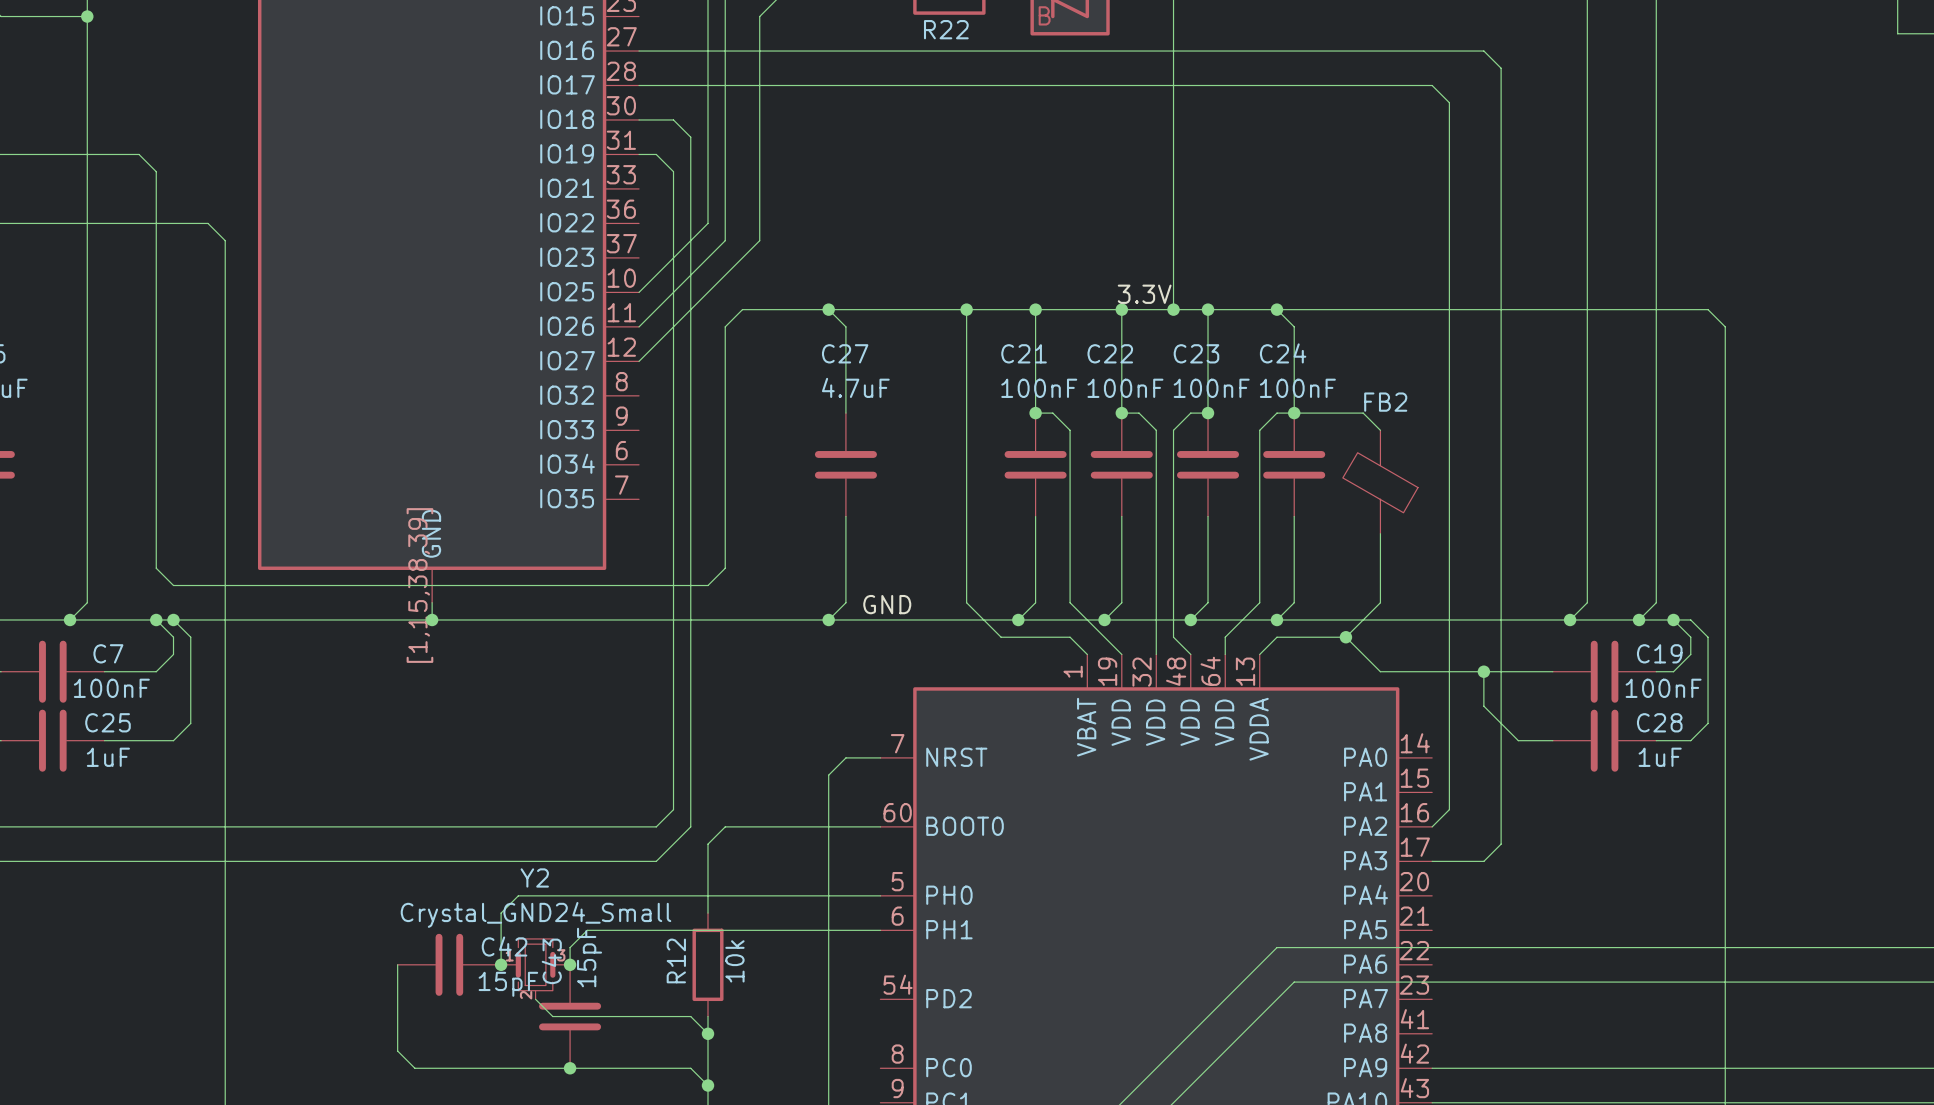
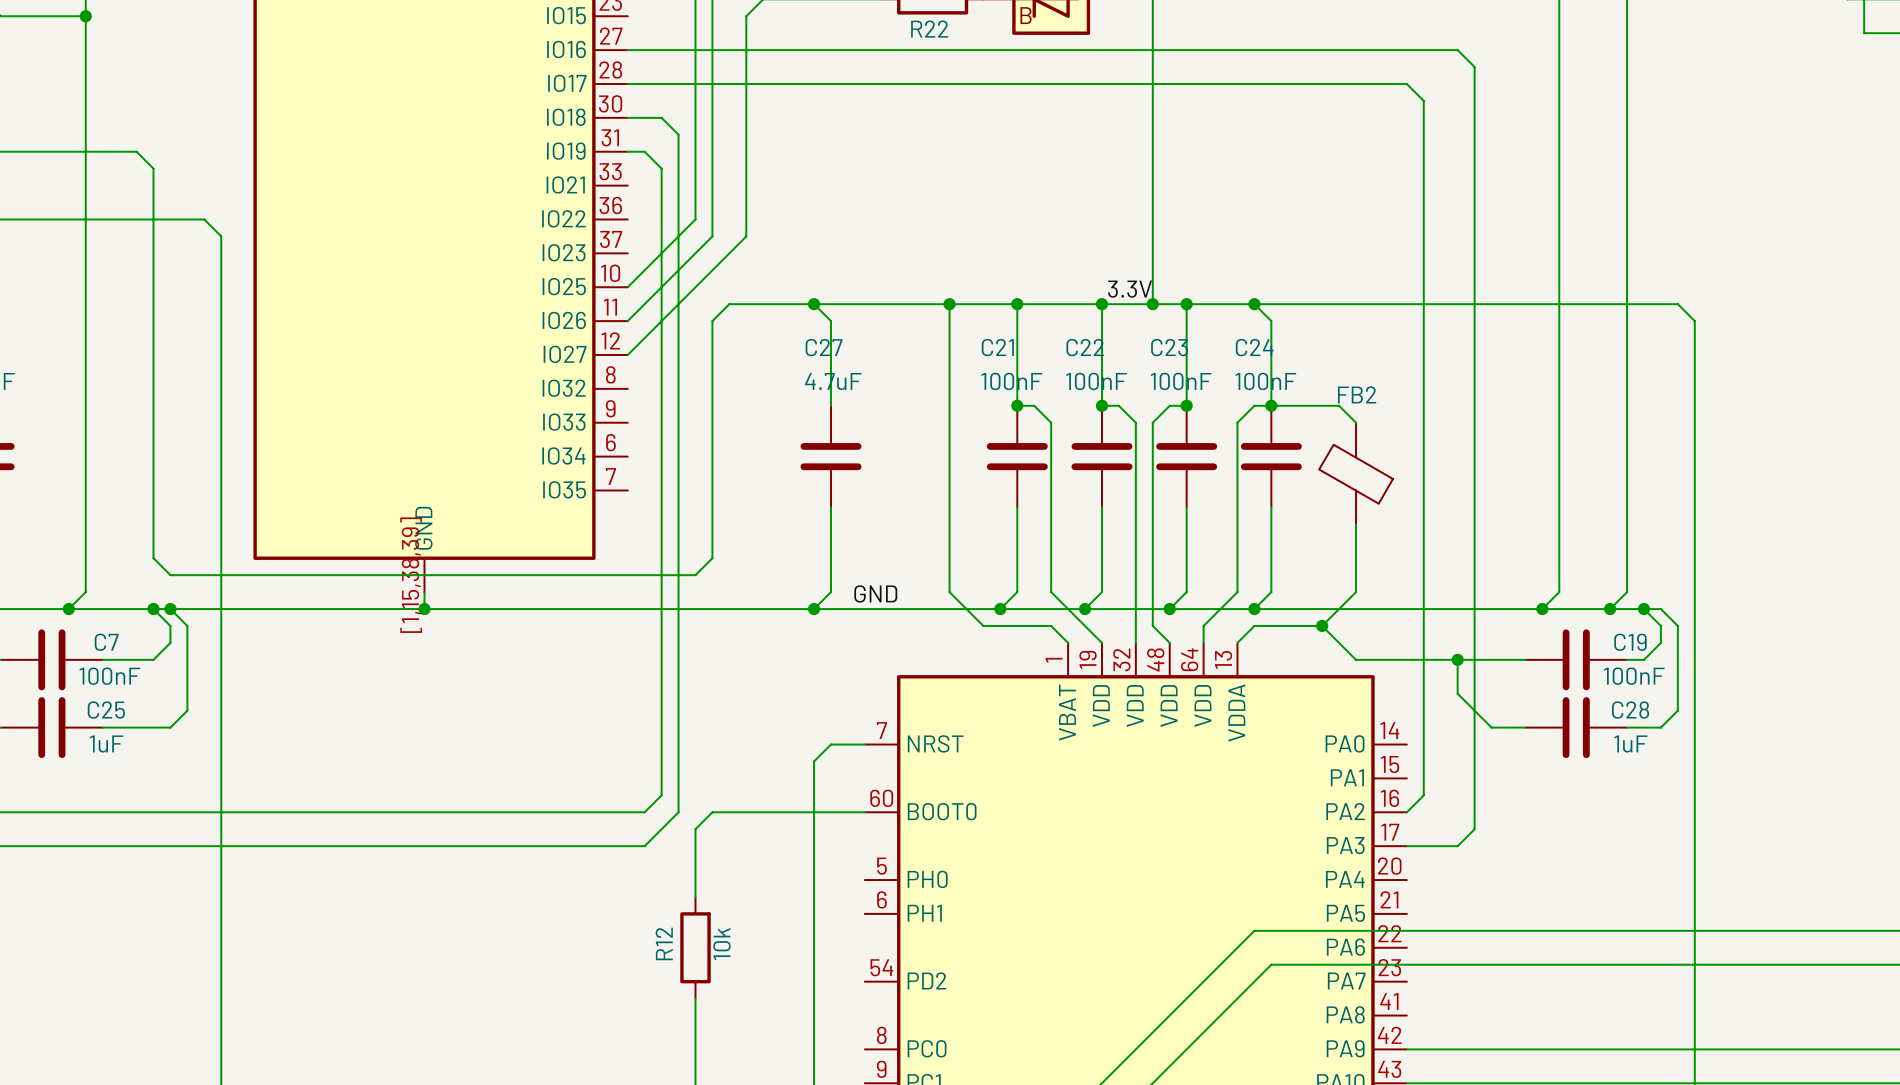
wire: (880, 895) (518, 895) (501, 913) (501, 964) -> none
wire: (880, 930) (587, 930) (570, 947) (570, 964) -> none
wire: (397, 964) (397, 1051) (414, 1068) (690, 1068) (708, 1085) -> none
C42: 15pF (449, 964) -> none
junction: (501, 964) -> none
junction: (570, 964) -> none
Y2: Crystal_GND24_Small (535, 969) -> none
wire: (535, 999) (552, 1016) (690, 1016) (708, 1033) -> none
C43: 15pF (570, 1016) -> none
junction: (708, 1033) -> none
junction: (570, 1068) -> none
junction: (708, 1085) -> none

